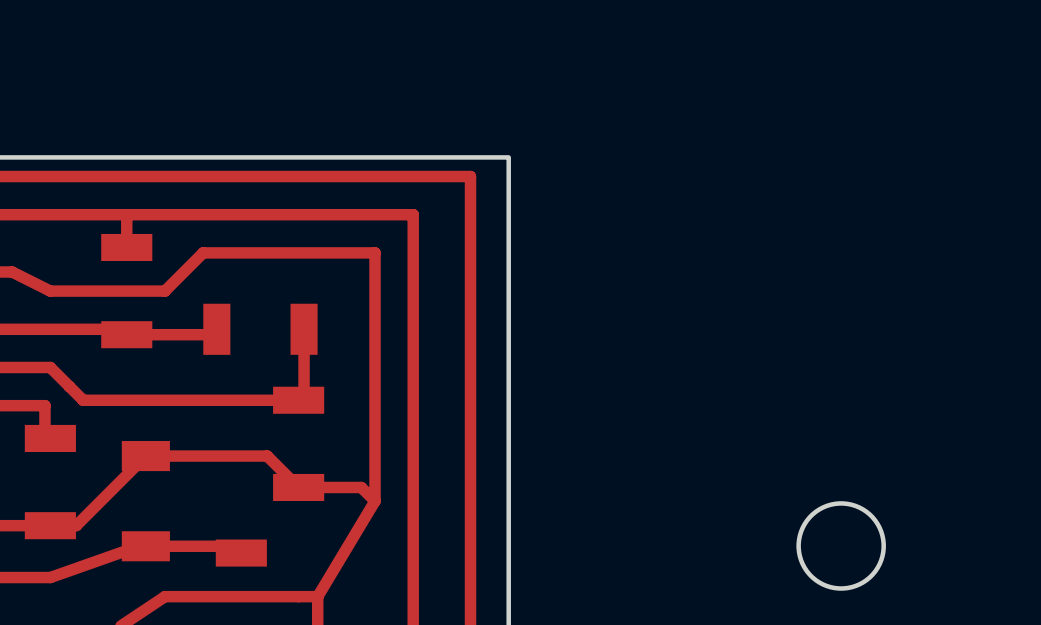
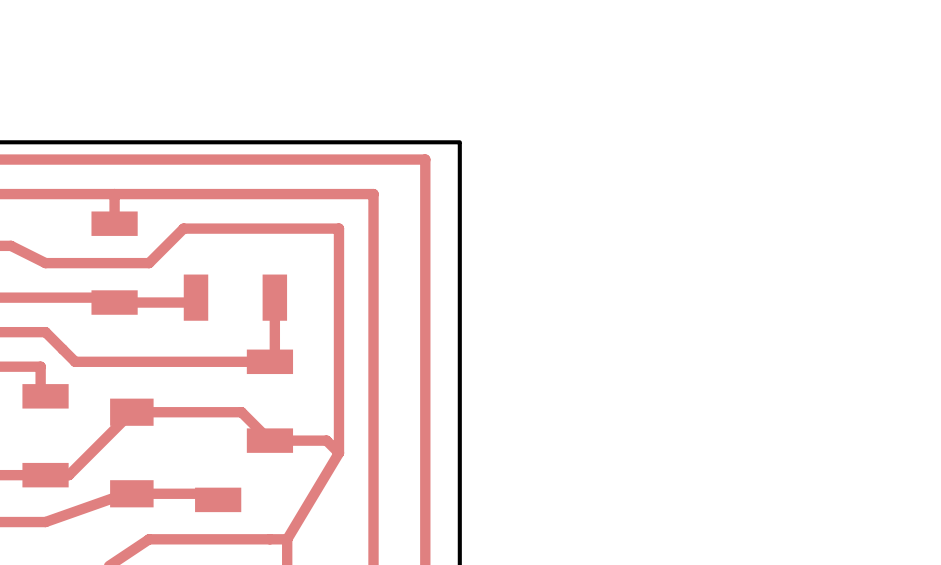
round board edge: [796, 501, 886, 591] -> none

